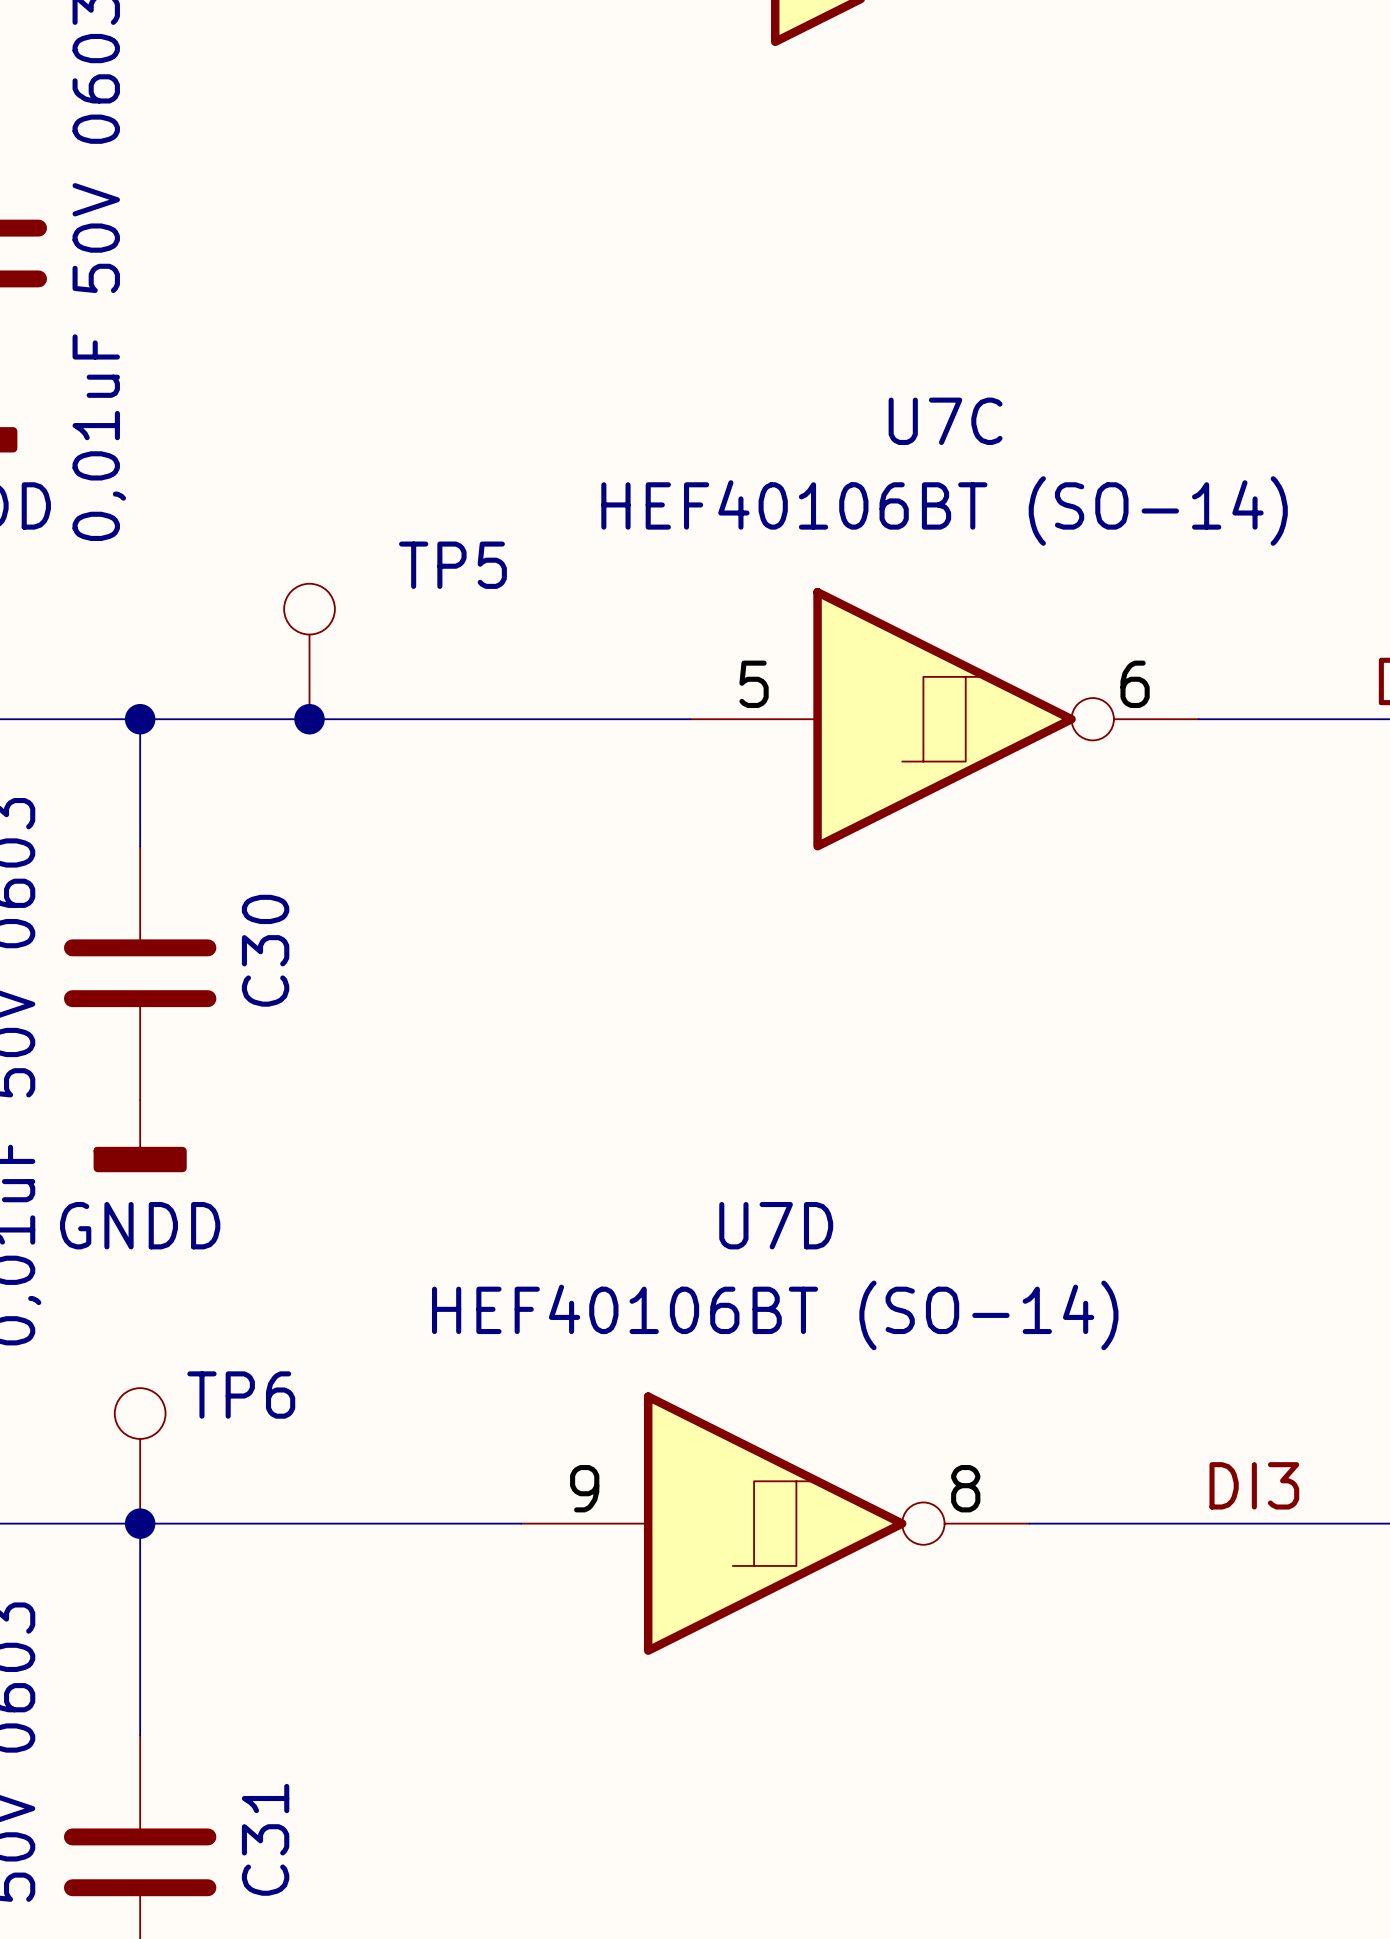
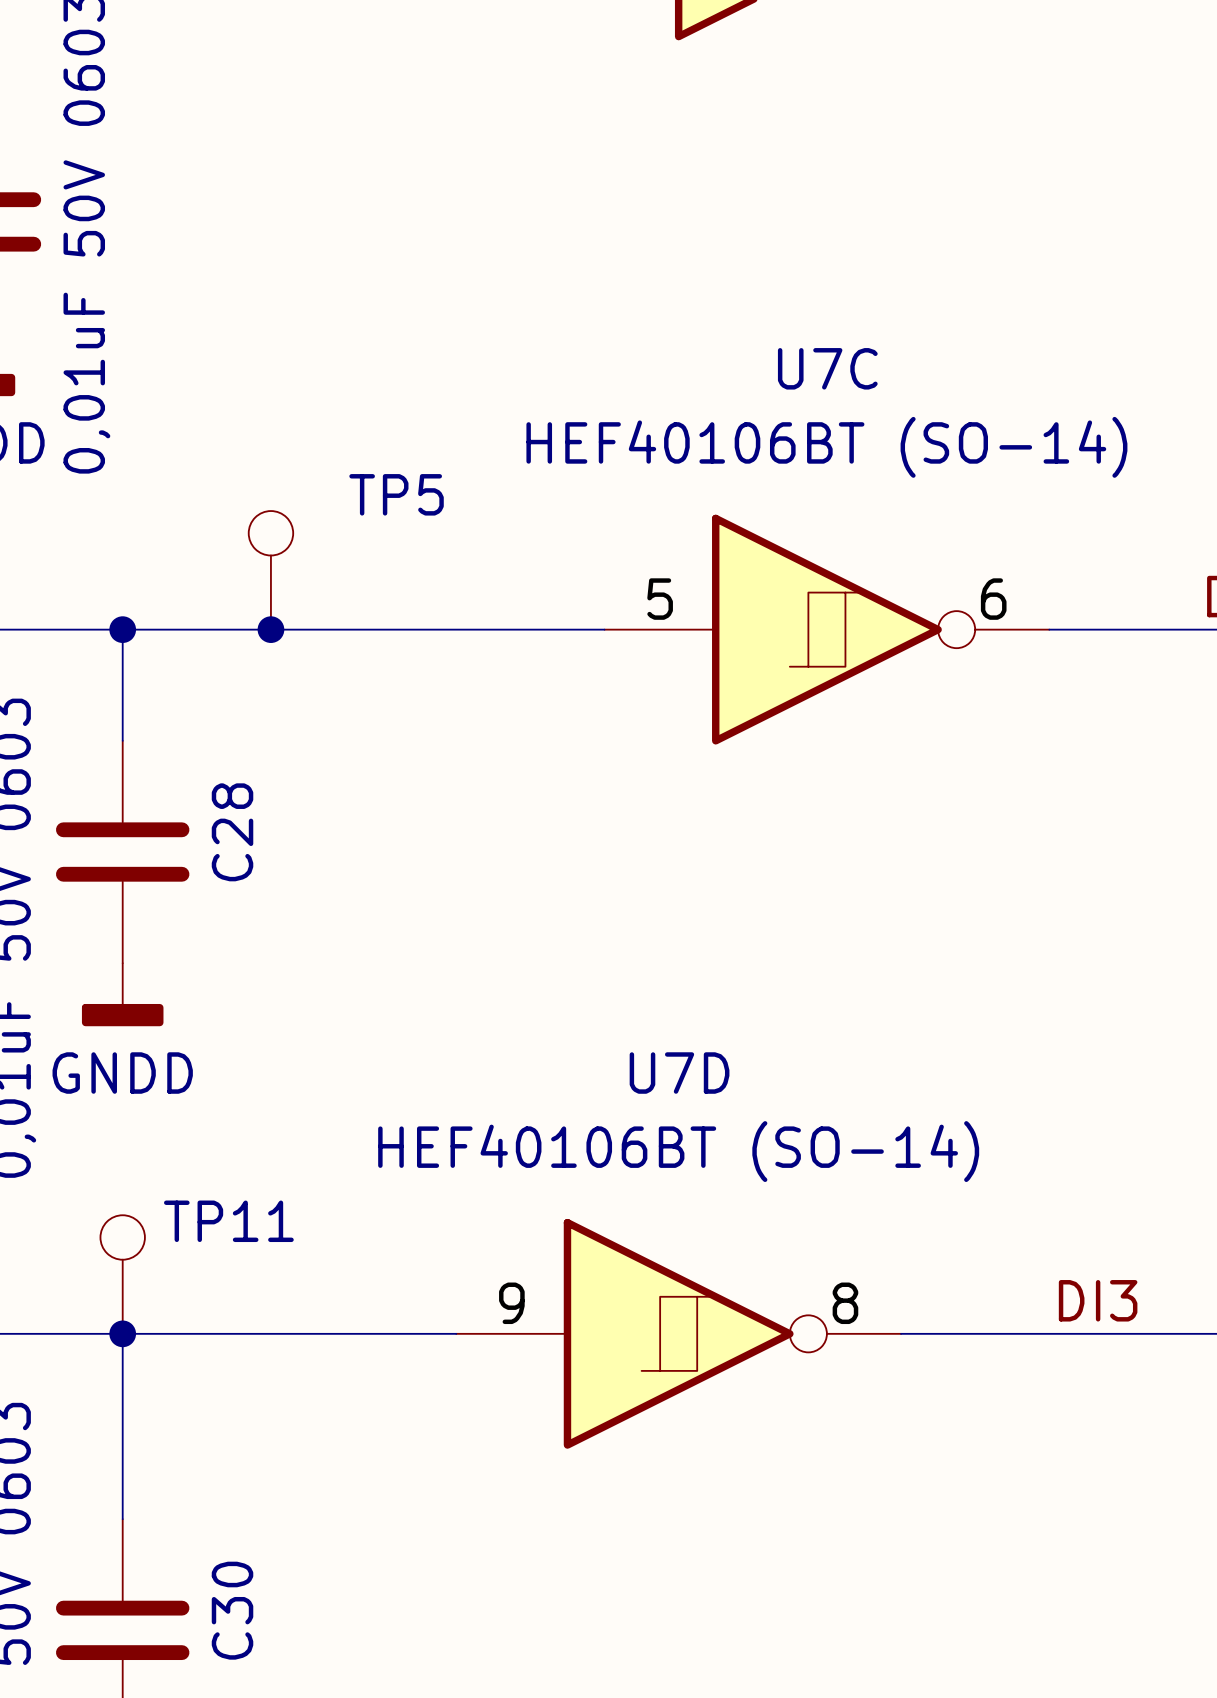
C30 name: C30 (265, 950) -> C28 (232, 832)
TP6 name: TP6 (241, 1395) -> TP11 (228, 1221)
C31 name: C31 (265, 1839) -> C30 (232, 1610)

